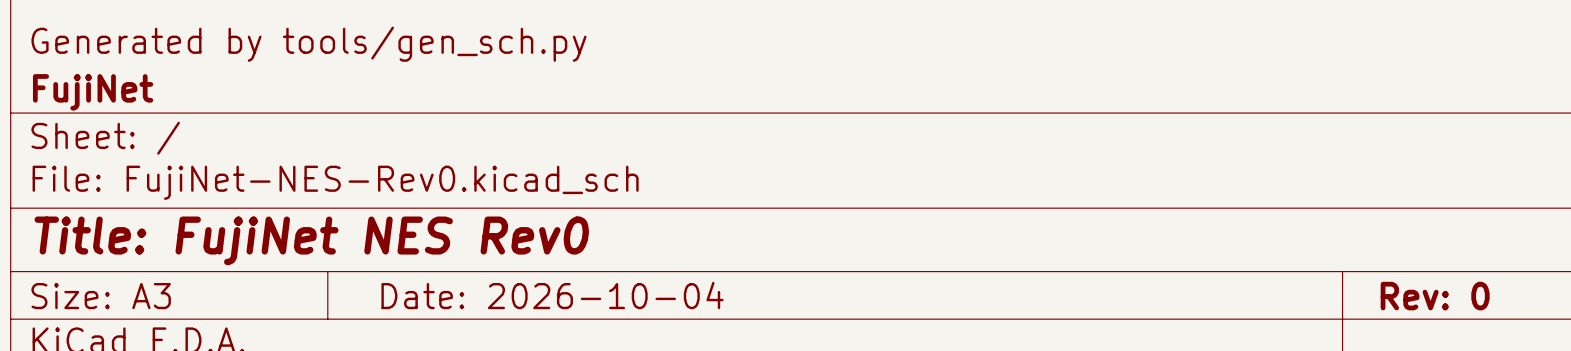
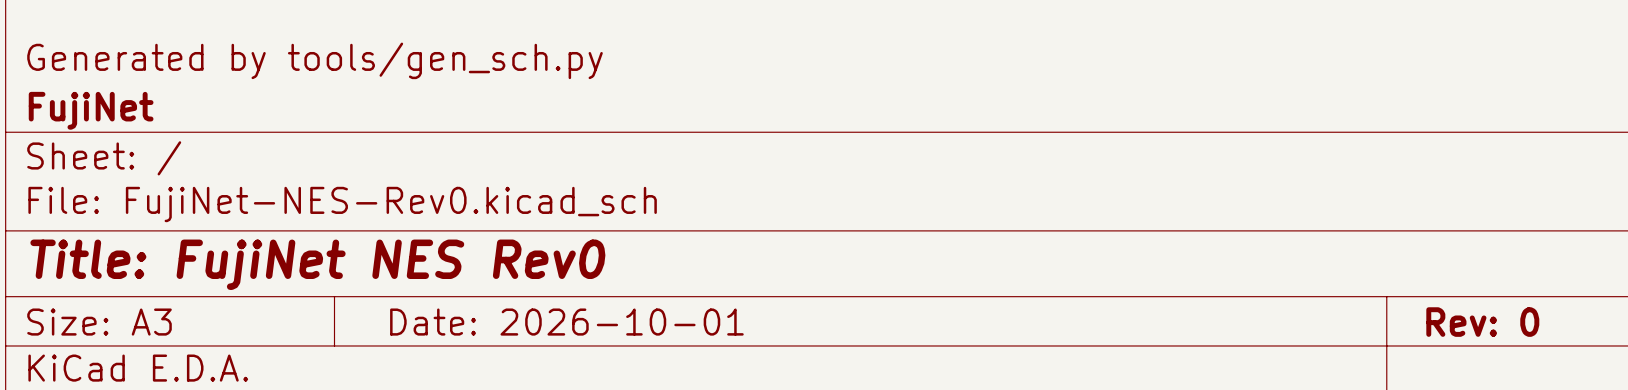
title block: Date: 2026-10-04 (552, 295) -> Date: 2026-10-01 (566, 322)

